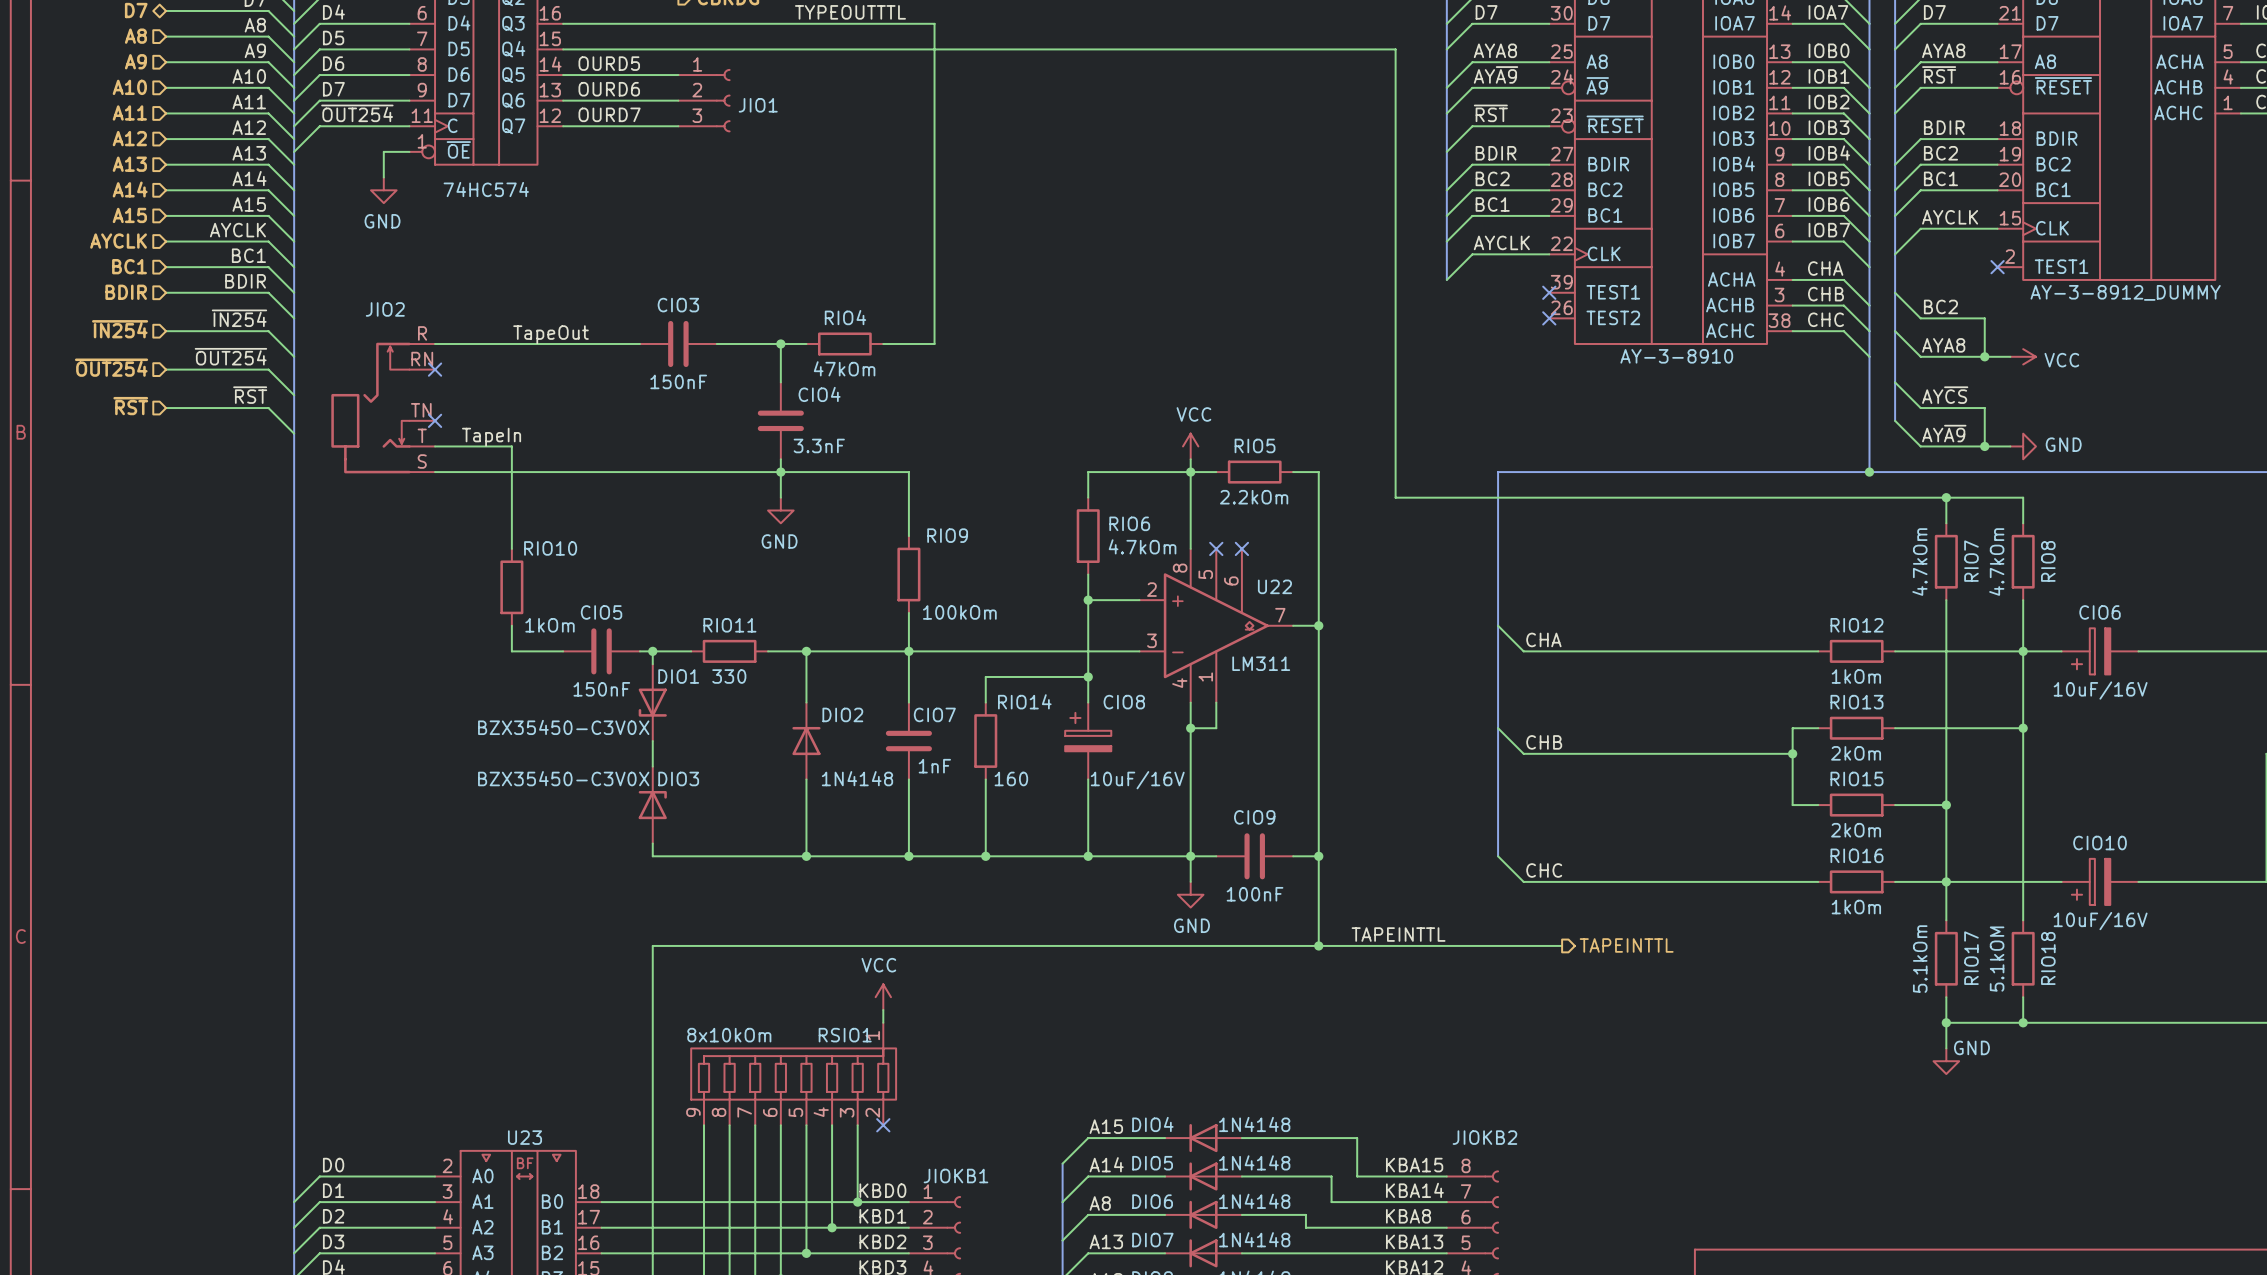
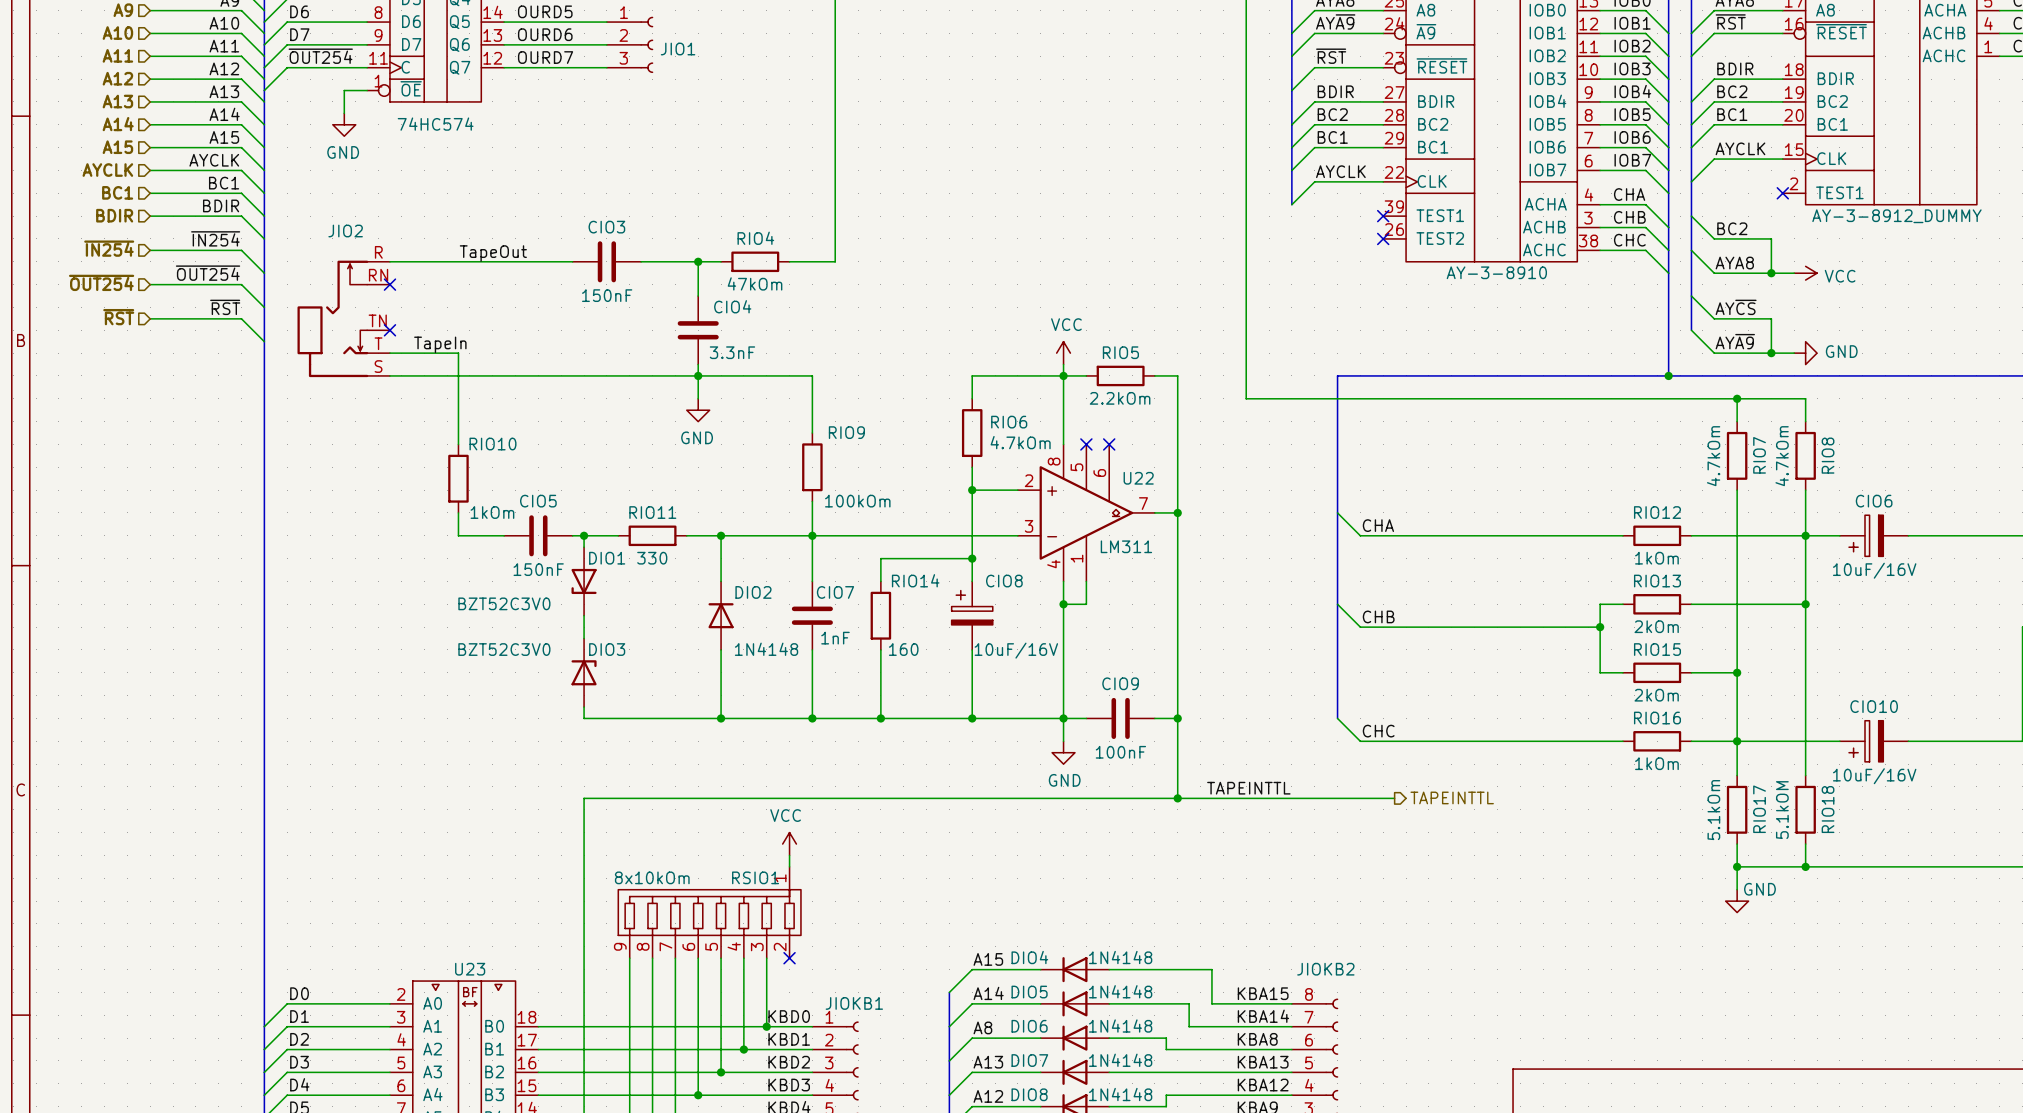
DIO1 value: BZX35450-C3V0X (563, 727) -> BZT52C3V0 (504, 603)
DIO3 value: BZX35450-C3V0X (563, 778) -> BZT52C3V0 (504, 649)

